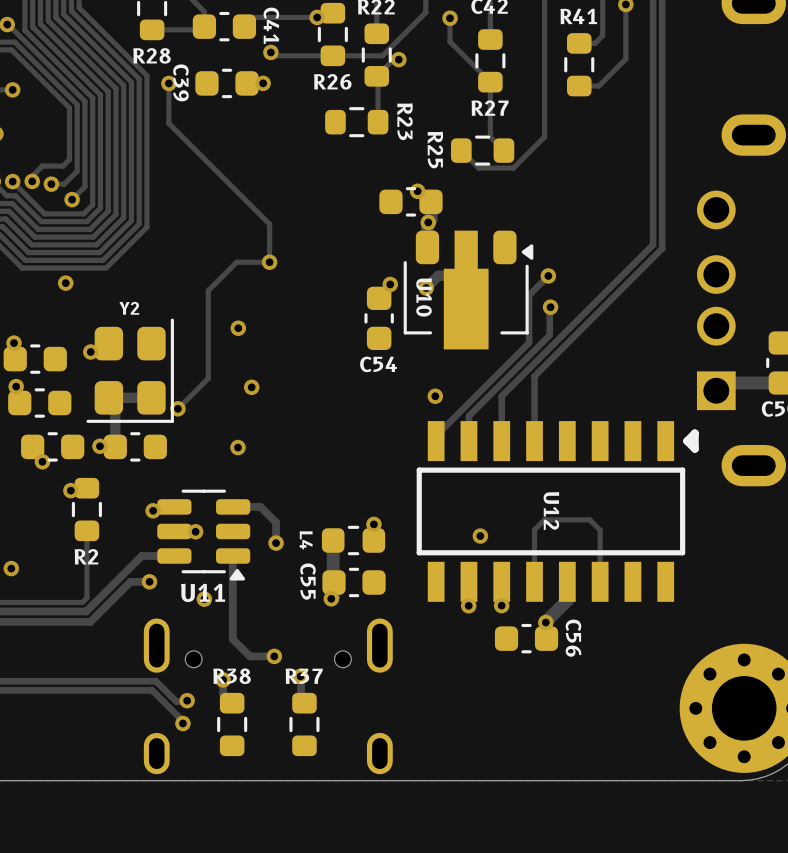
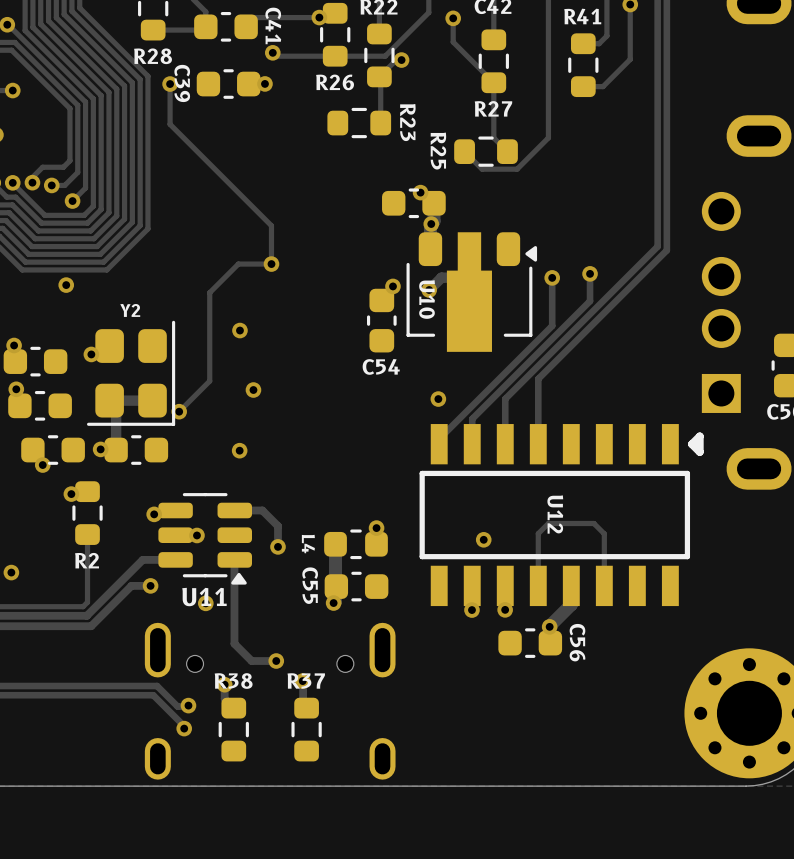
track: (548, 275) (529, 295) (529, 342) -> (552, 277) (552, 325) (532, 345)
track: (550, 307) (549, 335) -> (590, 273) (590, 301) (553, 337)
via position: (550, 307) -> (590, 273)
track: (780, 382) (724, 382) -> none

